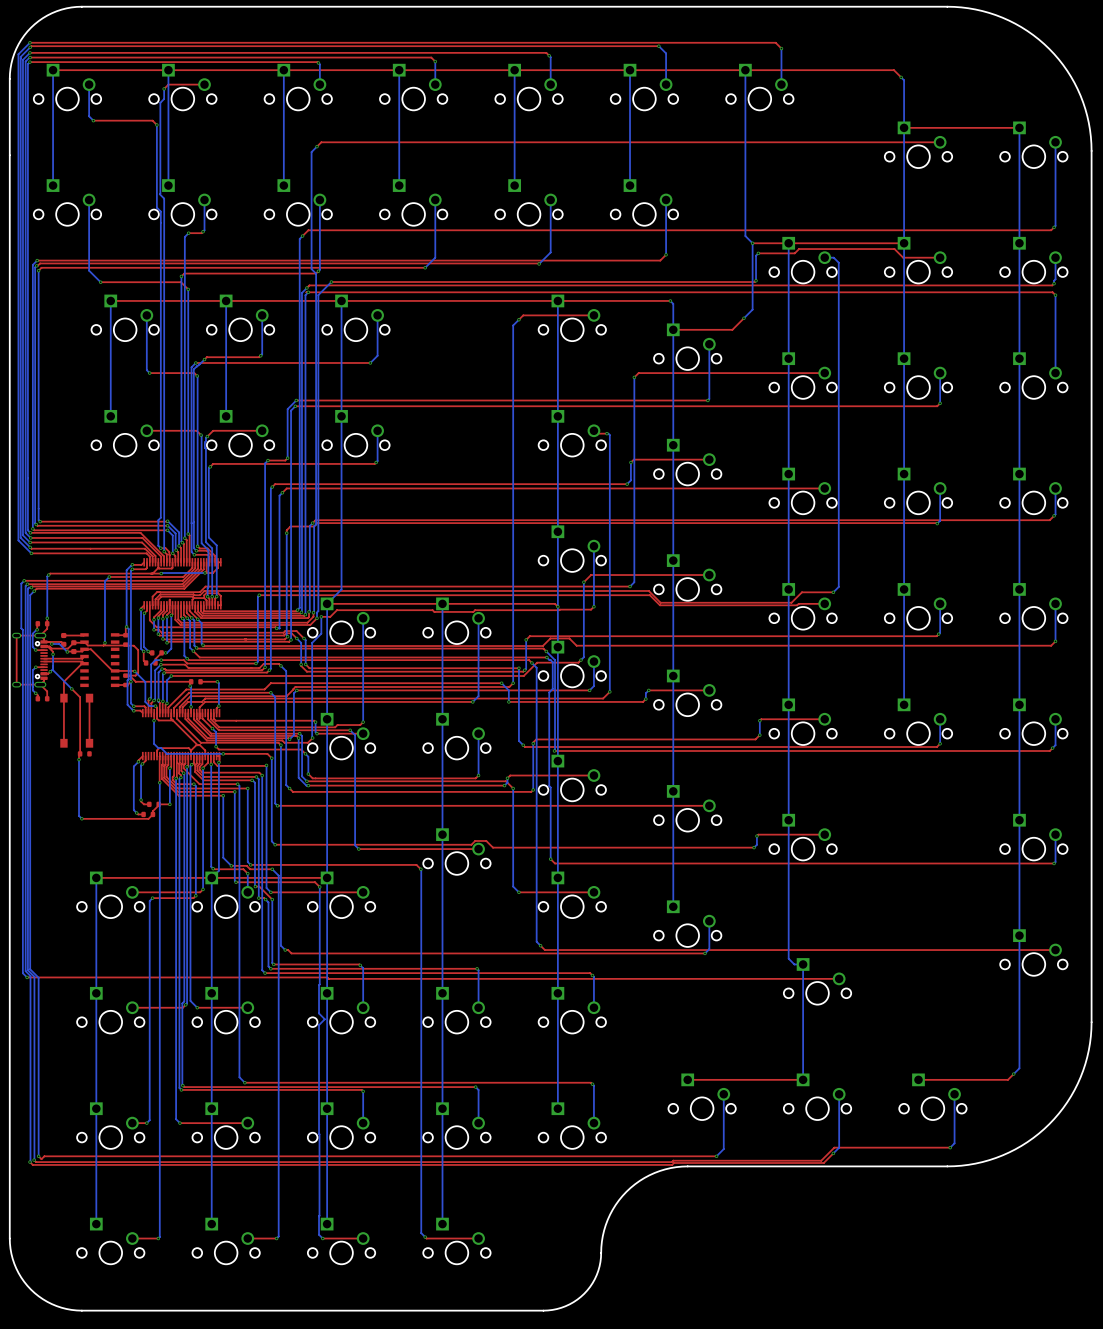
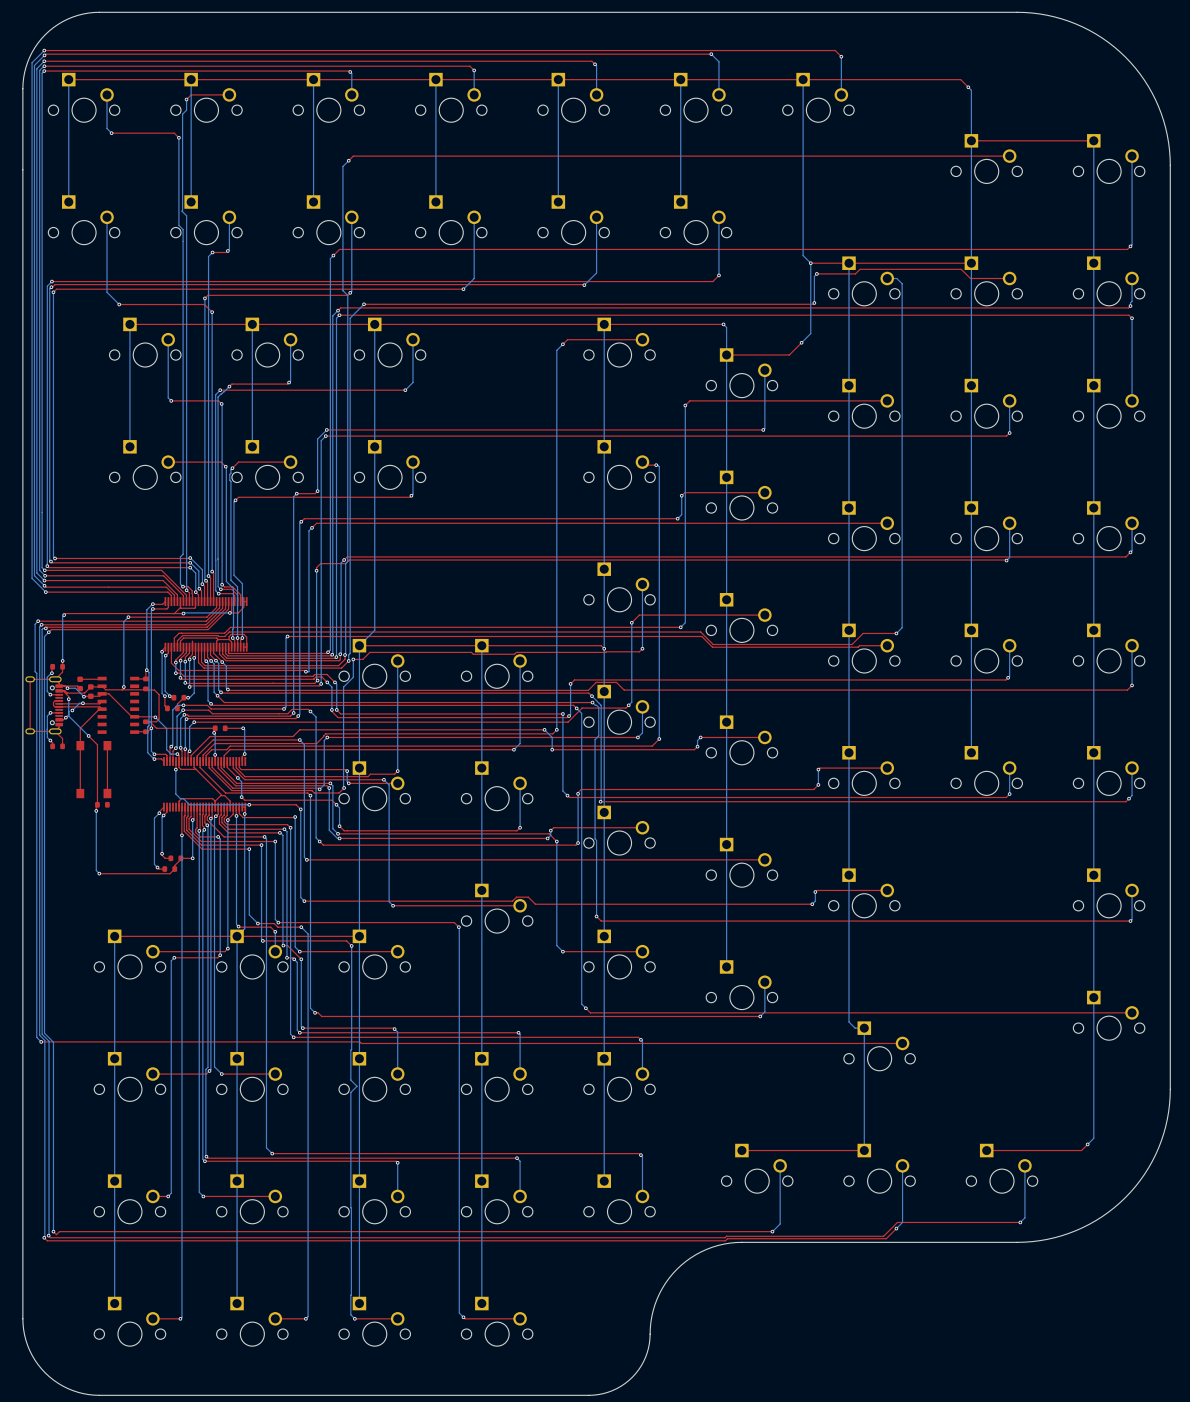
top track: none -> (59, 700) (53, 702) (54, 706) (59, 706)
bottom track: none -> (82, 703) (79, 703) (72, 710)
via: none -> (82, 703)
via: none -> (72, 710)

